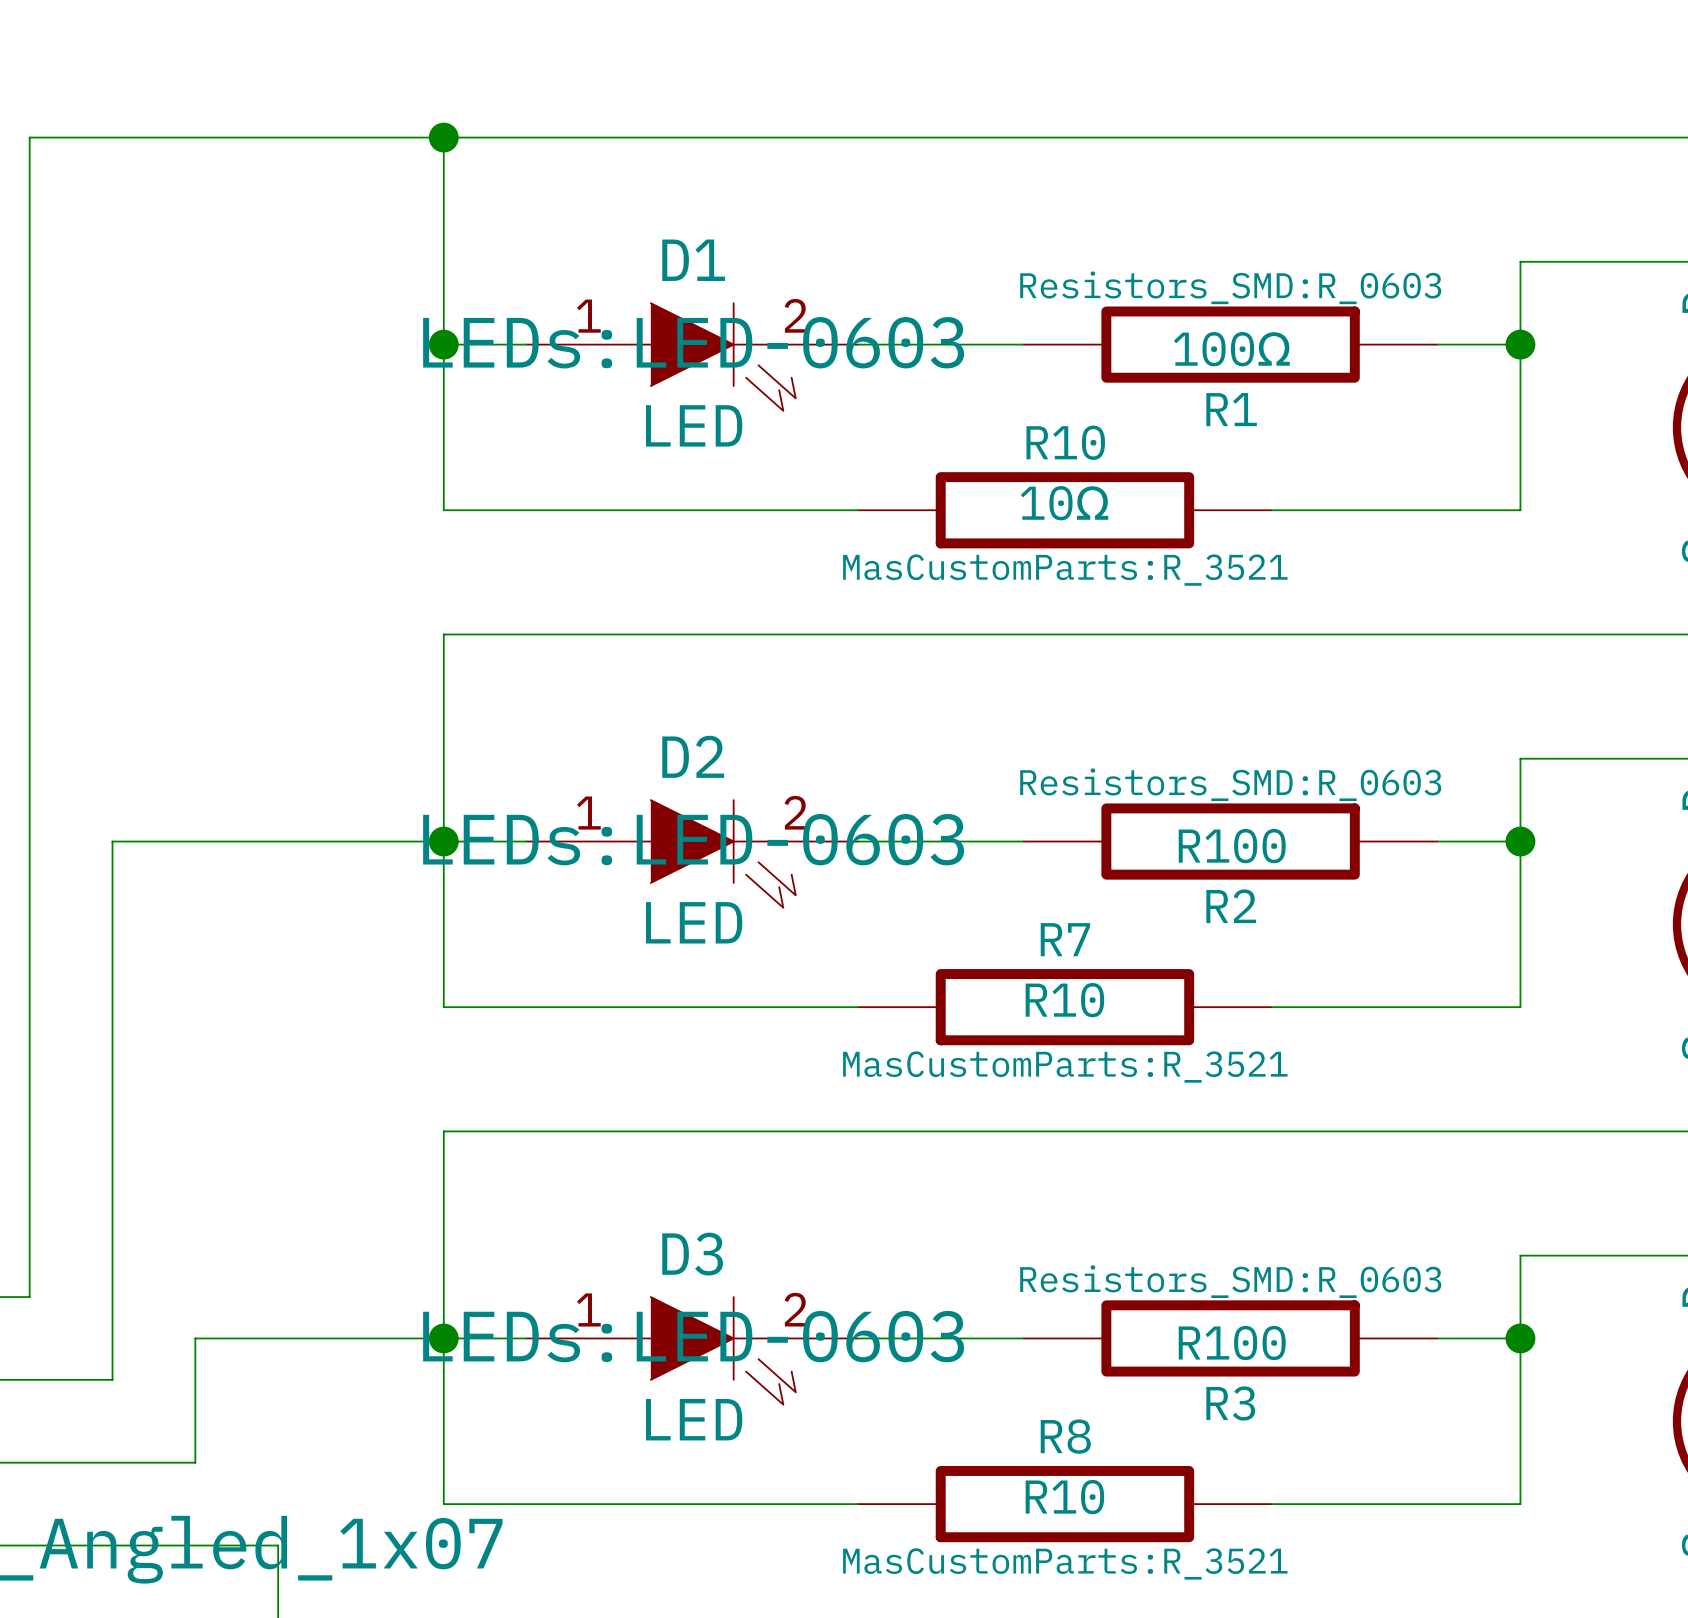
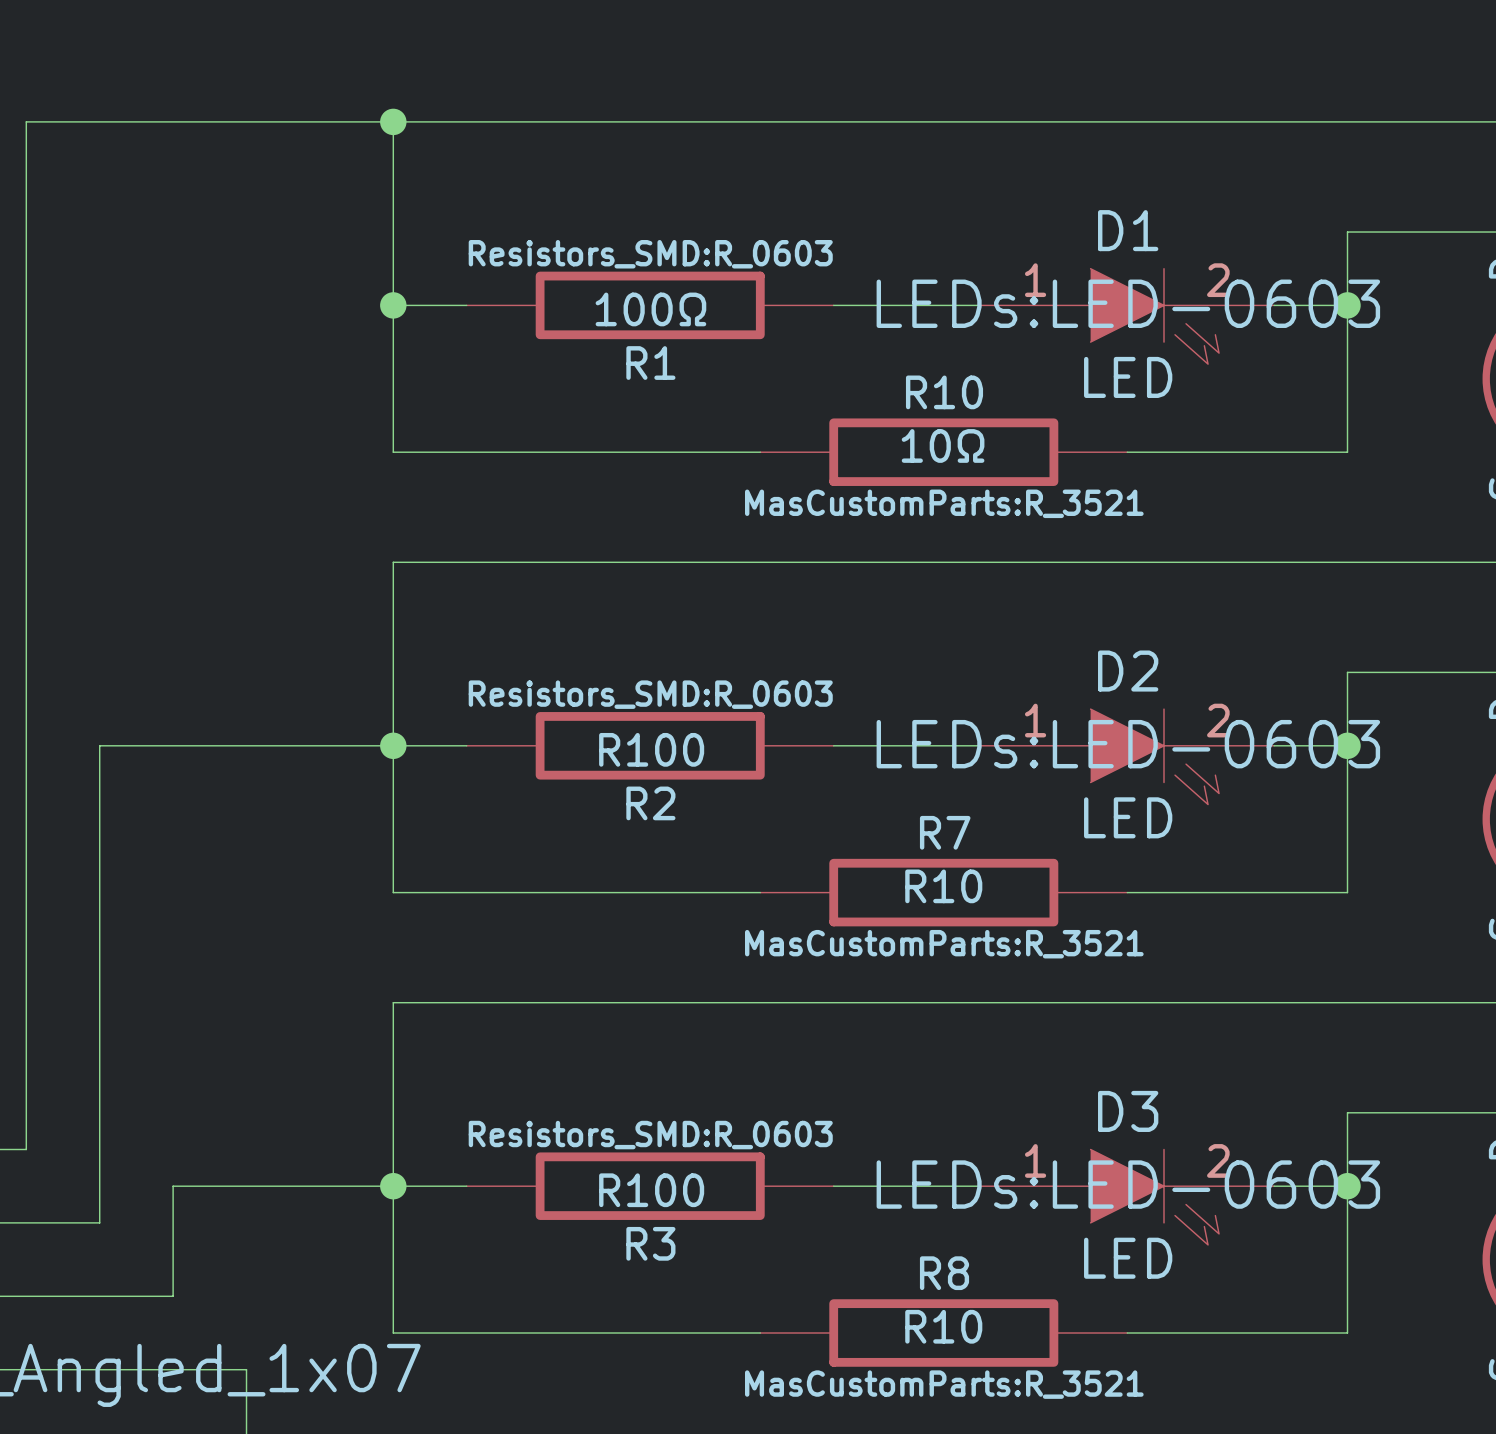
R1 position: (1230, 344) -> (650, 305)
D1 position: (692, 357) -> (1127, 316)
R2 position: (1230, 841) -> (650, 745)
D2 position: (692, 853) -> (1127, 756)
R3 position: (1230, 1338) -> (650, 1186)
D3 position: (692, 1350) -> (1127, 1197)

